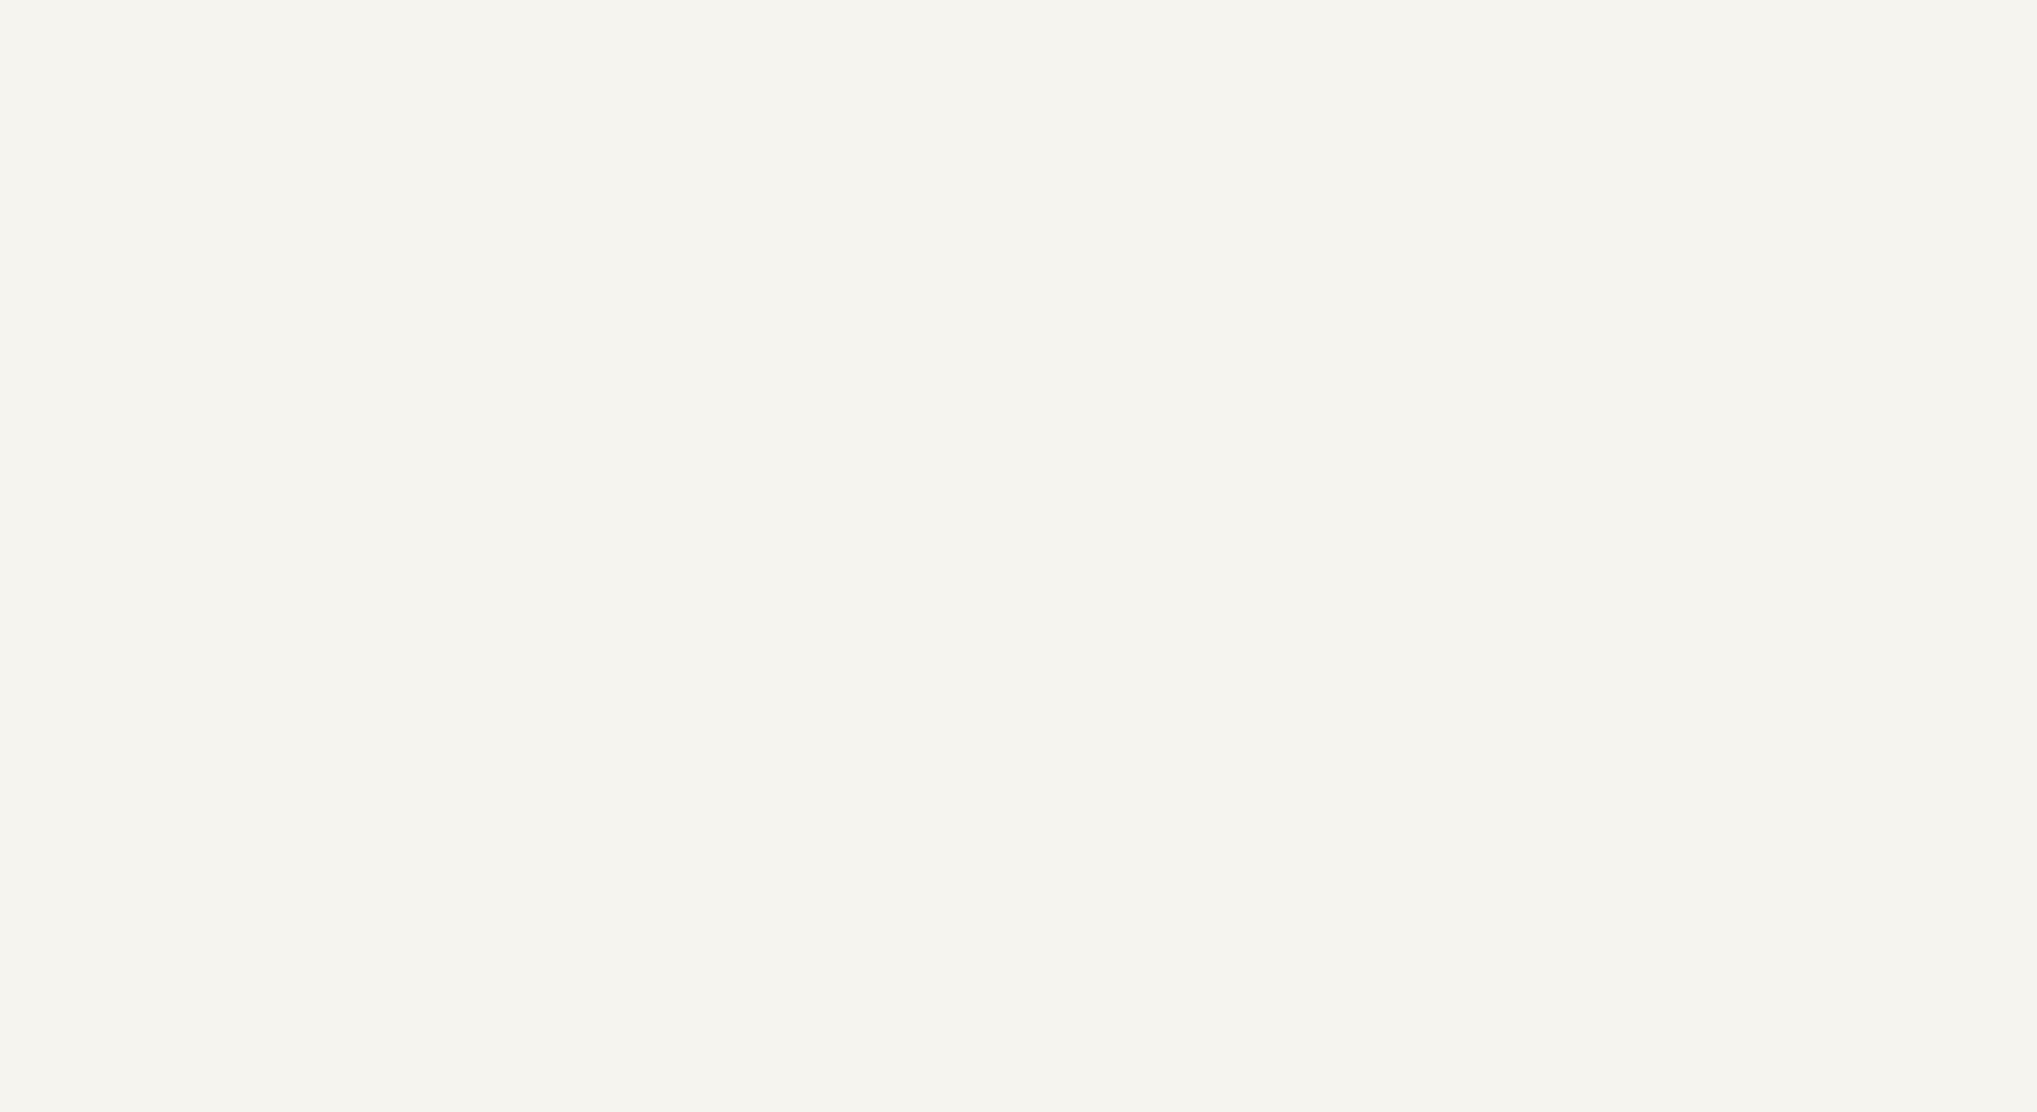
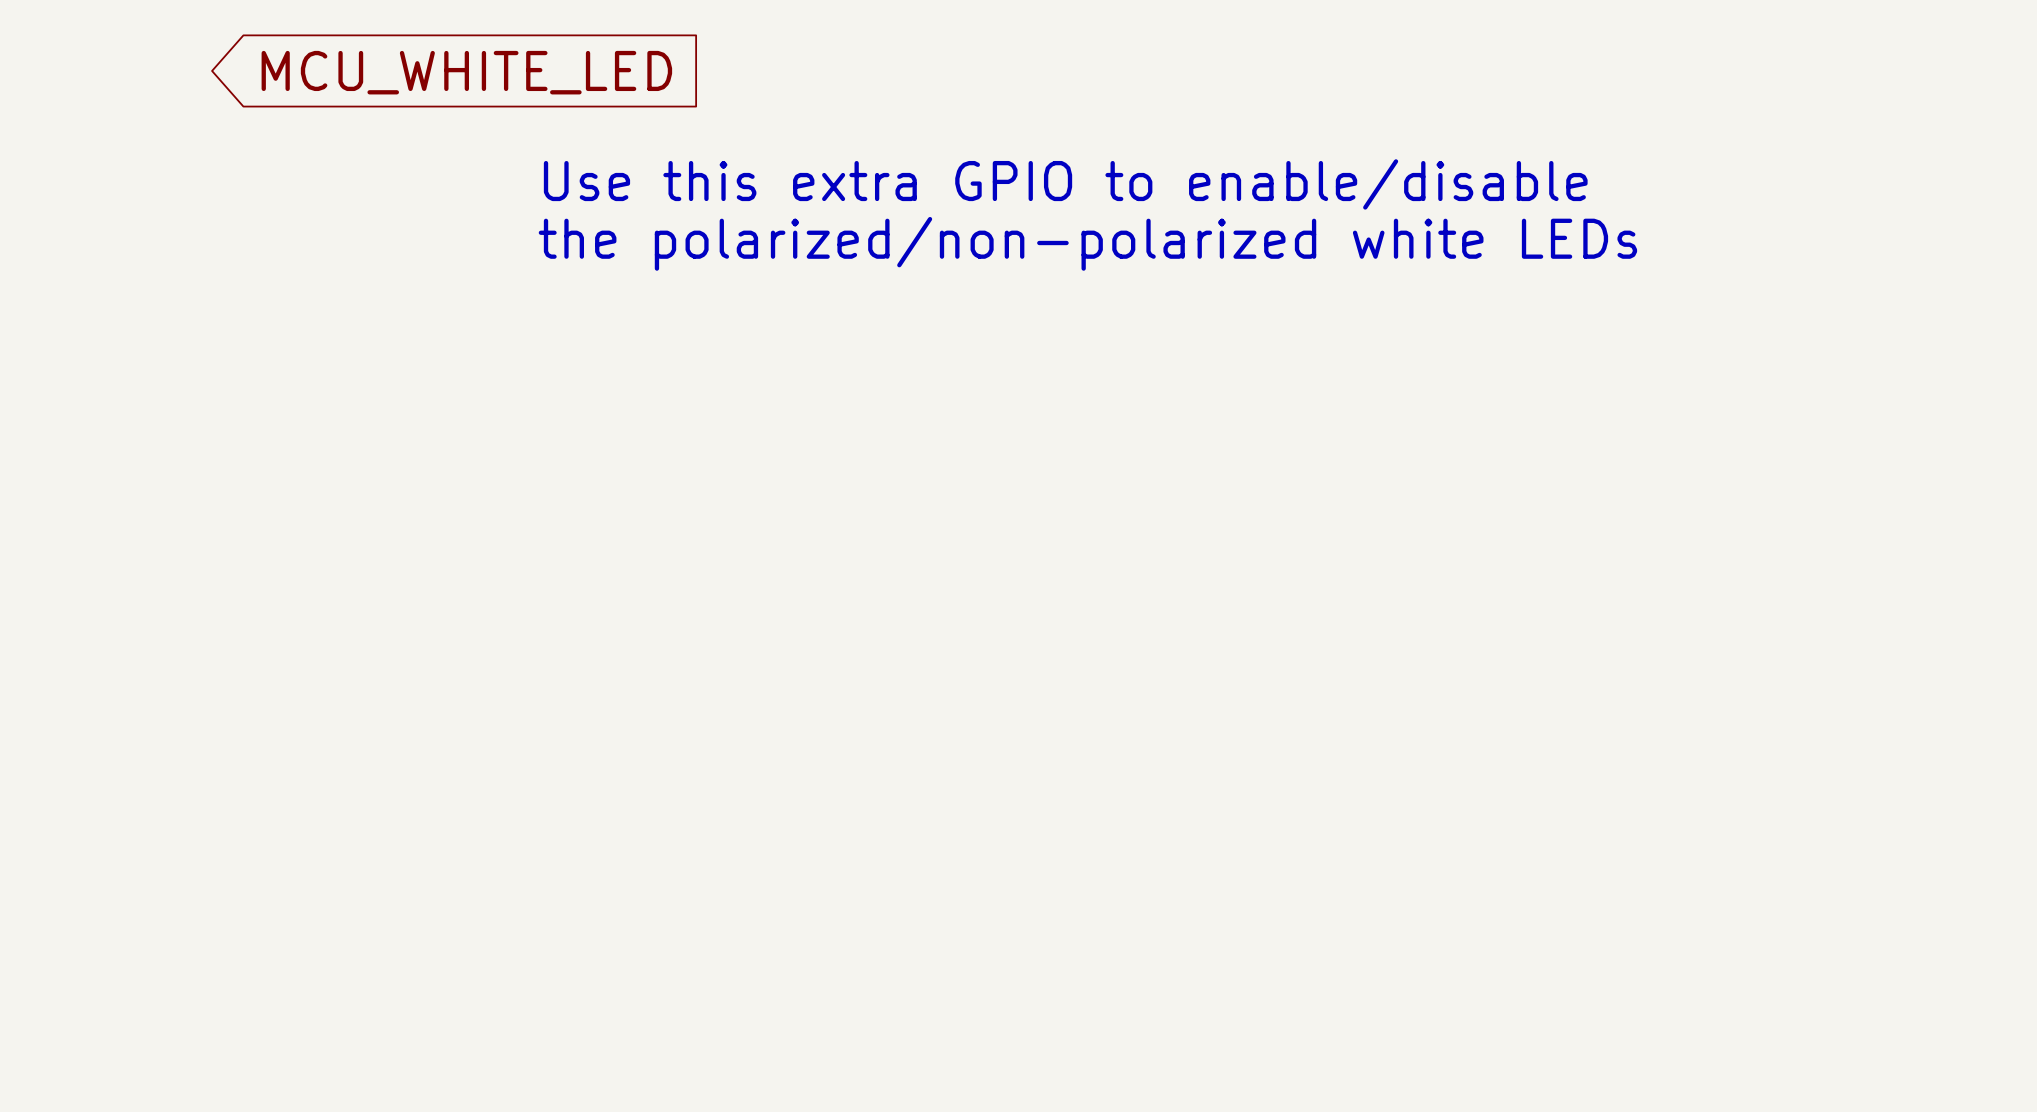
global label: none -> MCU_WHITE_LED (466, 72)
text: none -> Use this extra GPIO to enable/disable (1065, 184)
text: none -> the polarized/non-polarized white LEDs (1087, 243)

